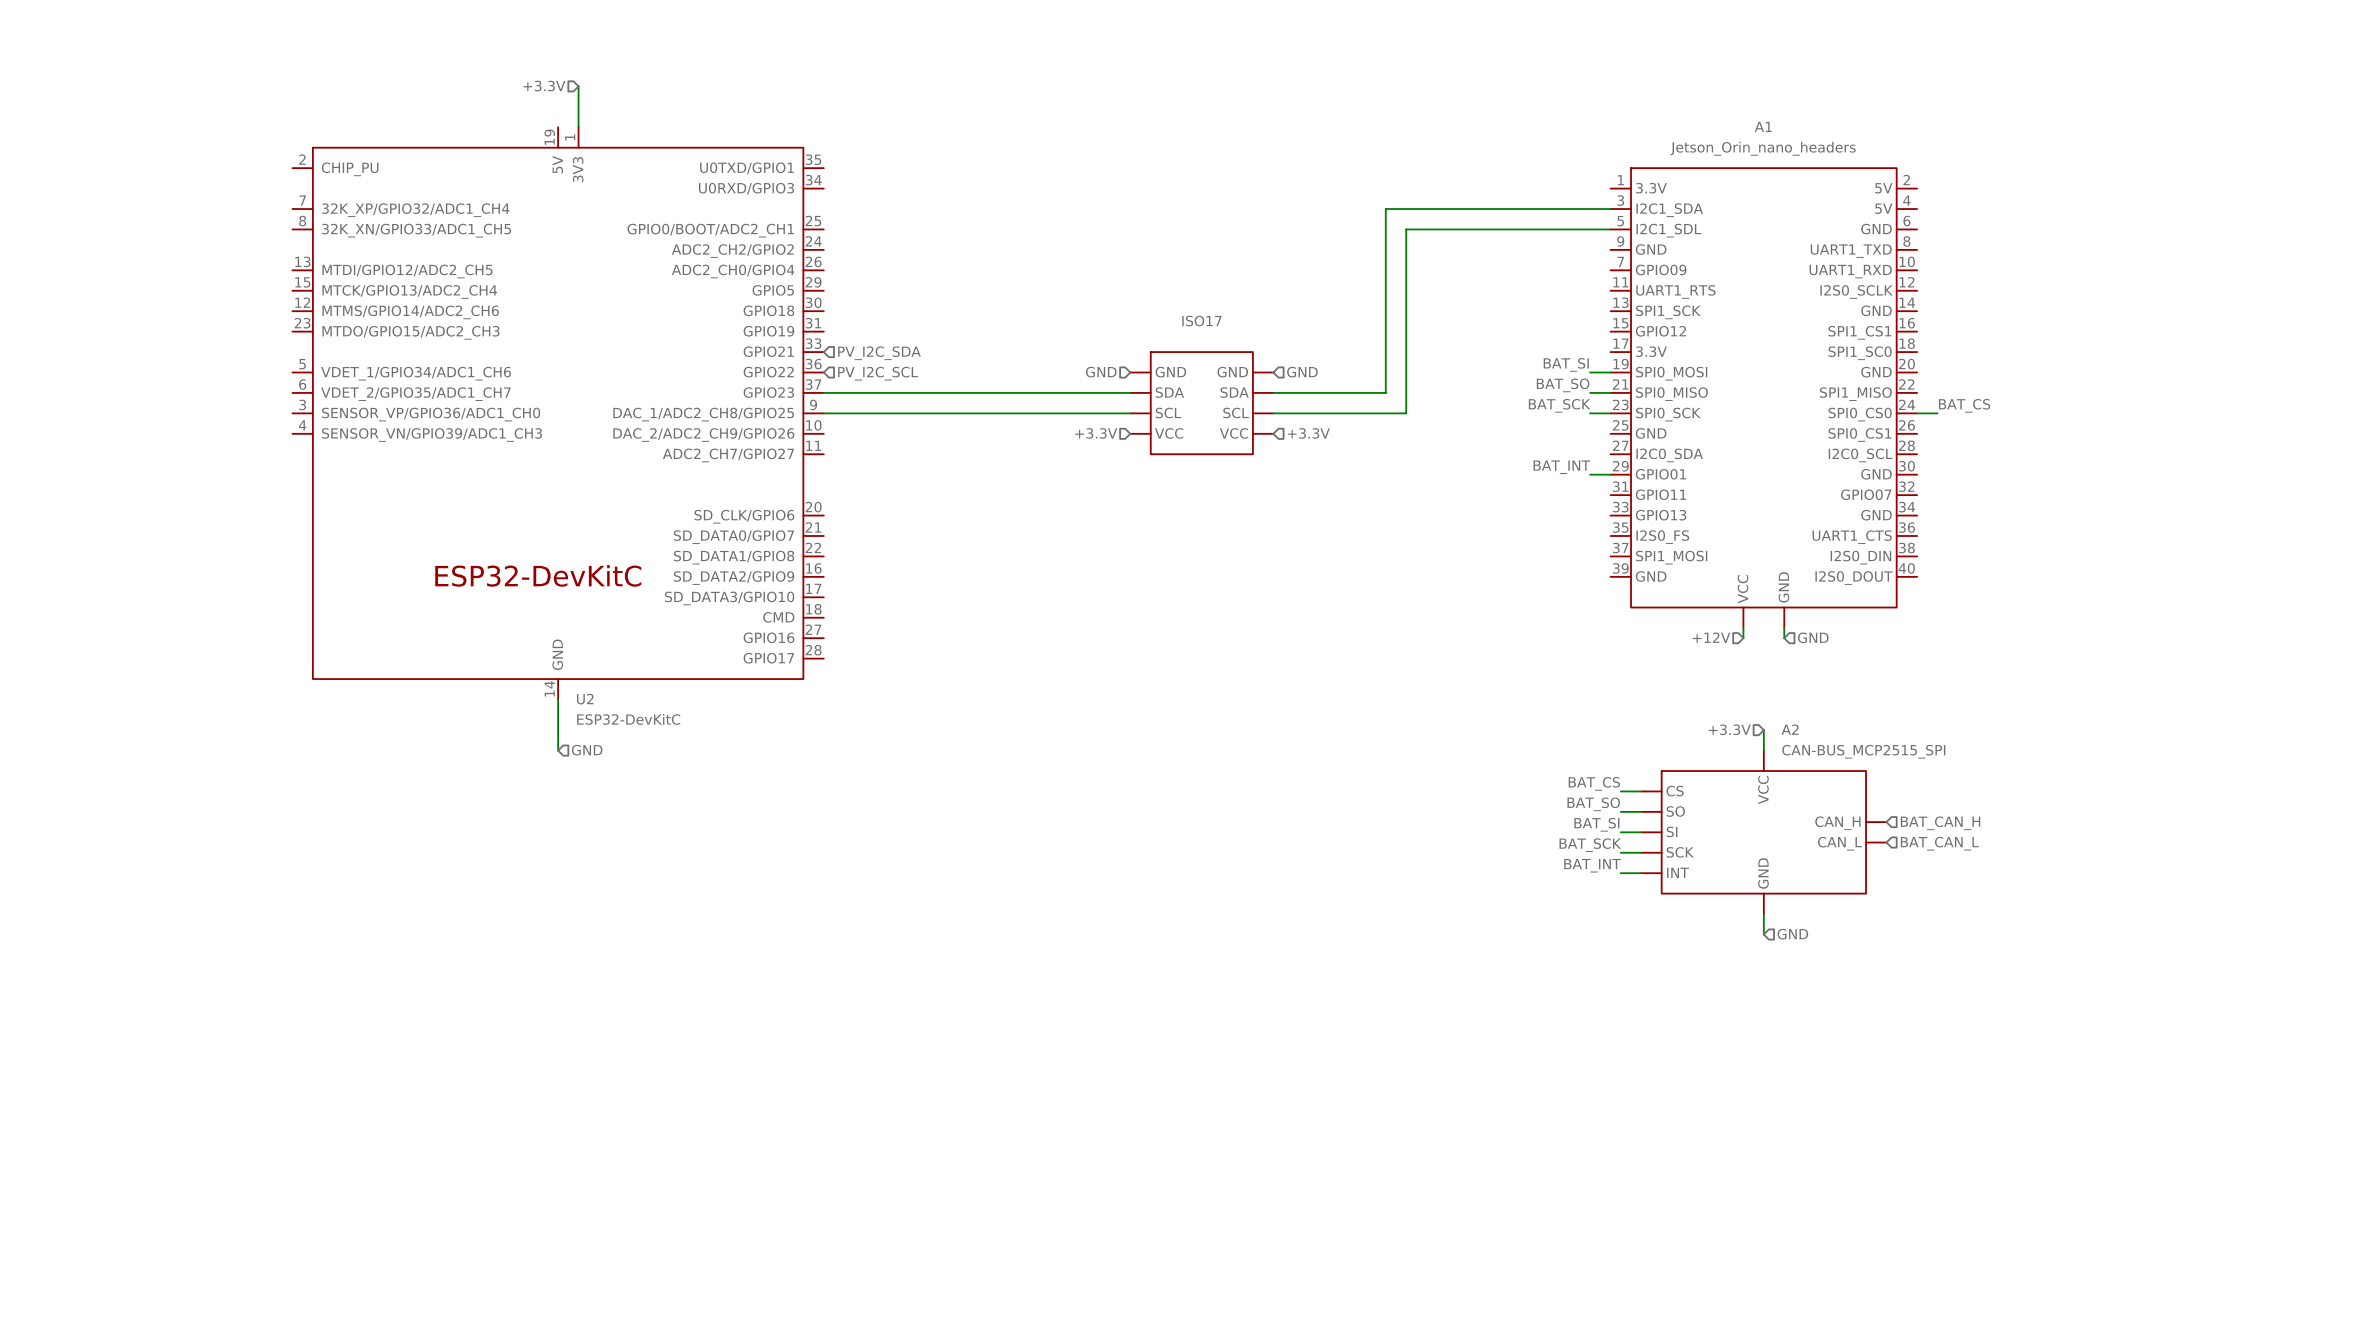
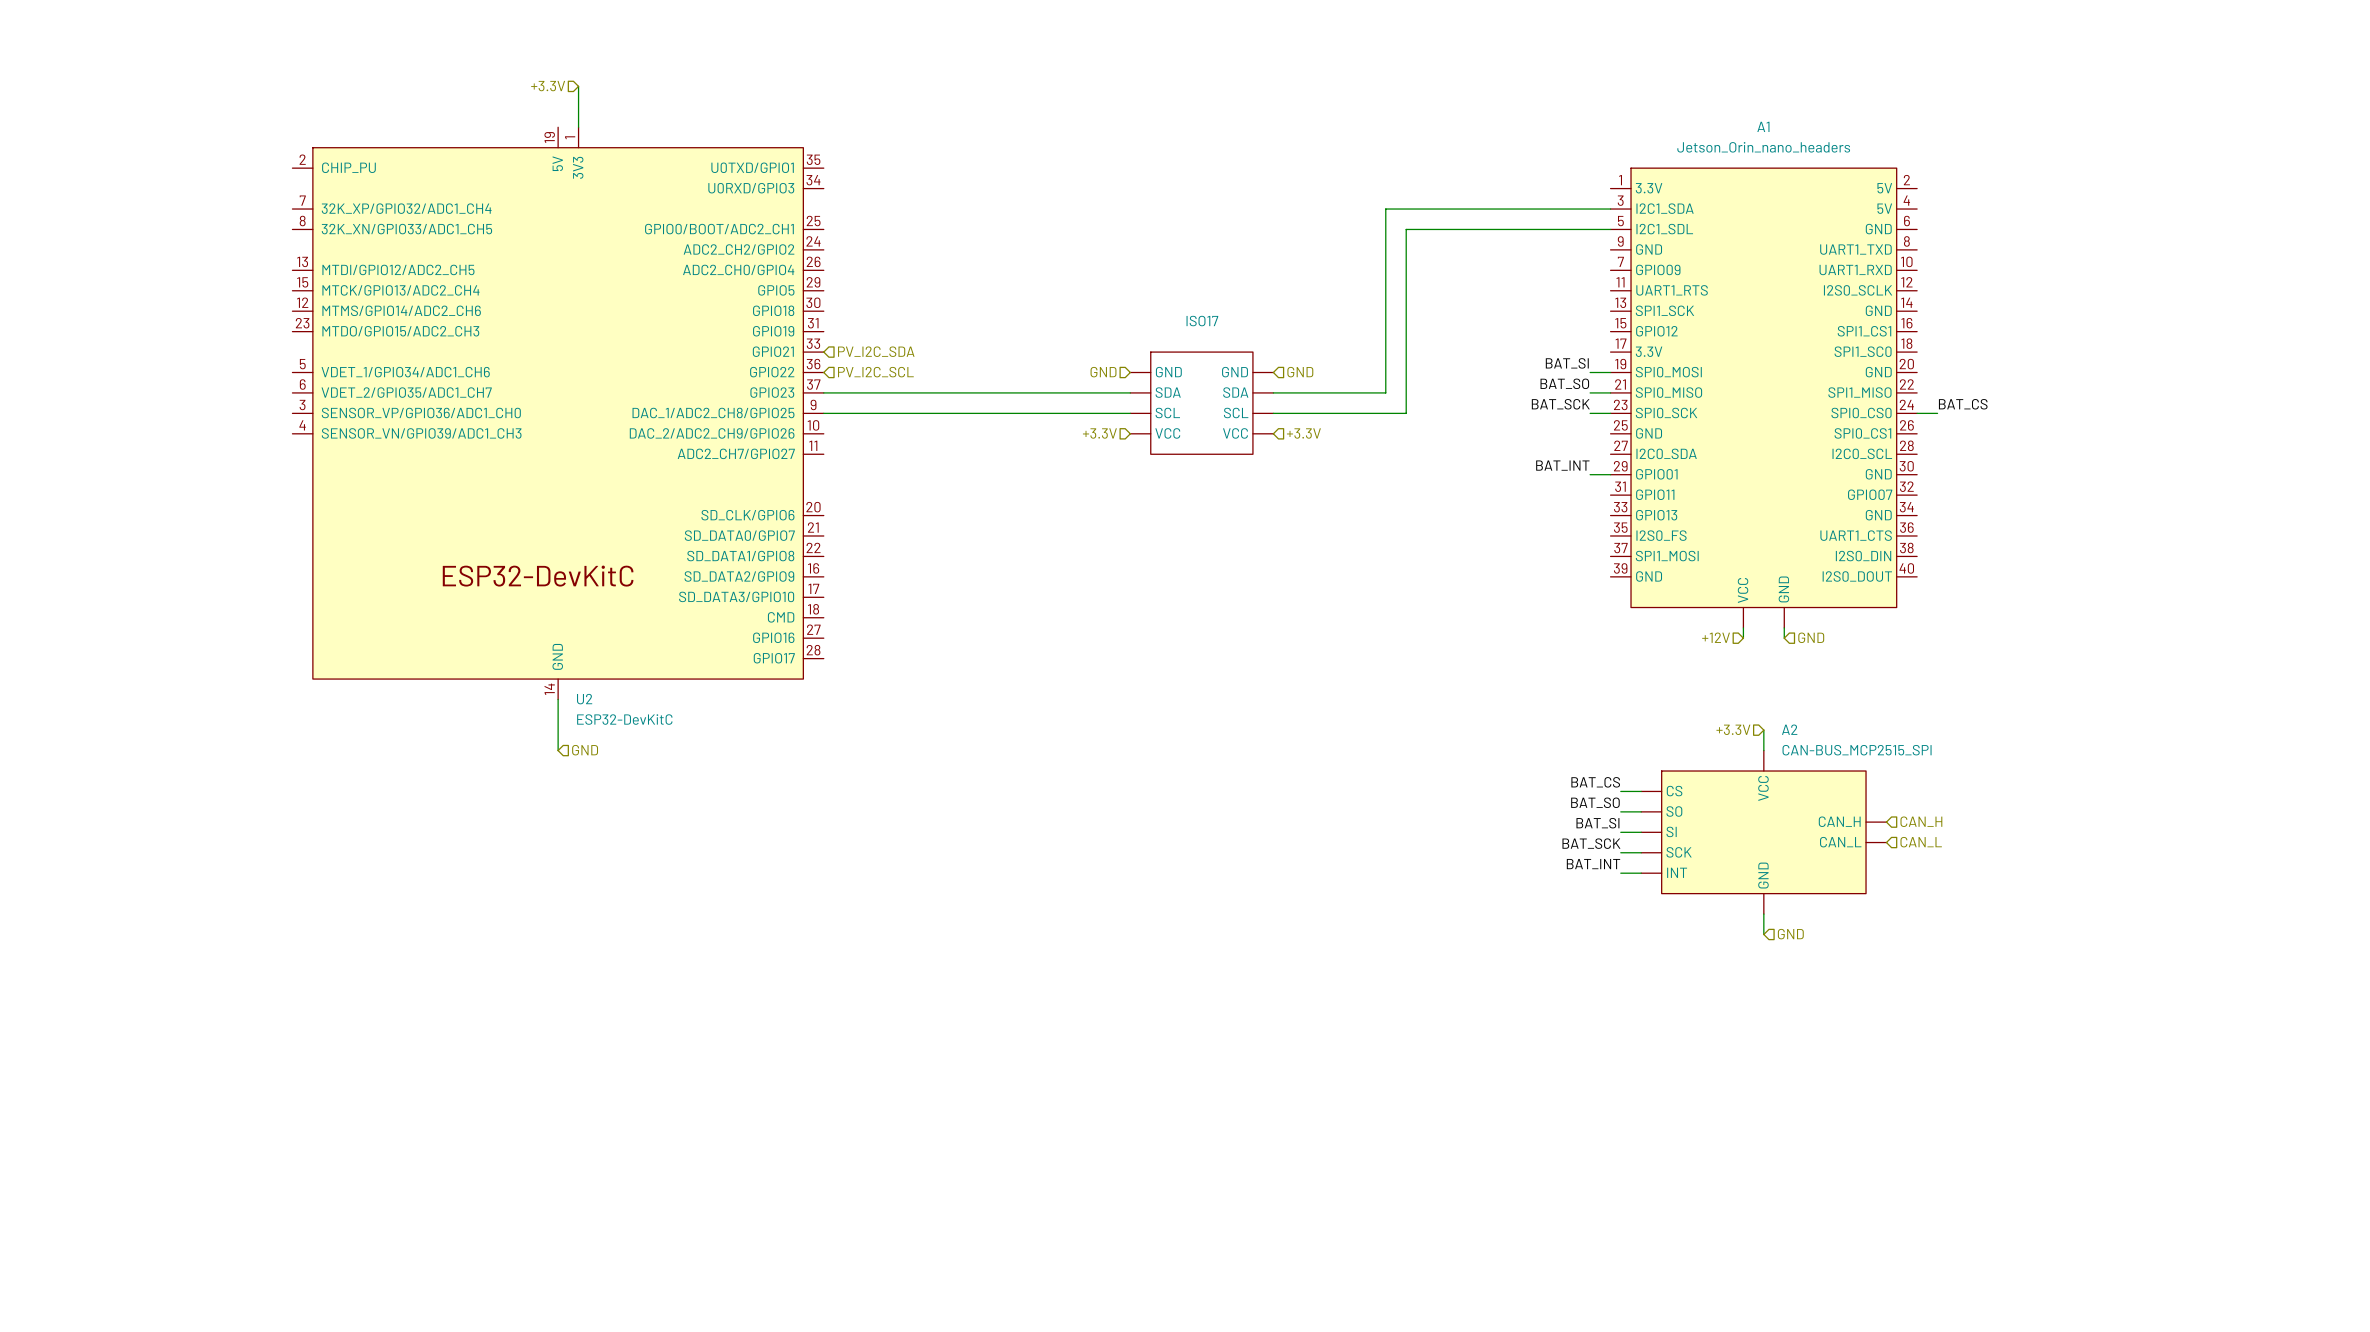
hierarchical label: BAT_CAN_H (1940, 823) -> CAN_H (1921, 821)
hierarchical label: BAT_CAN_L (1939, 843) -> CAN_L (1921, 842)

